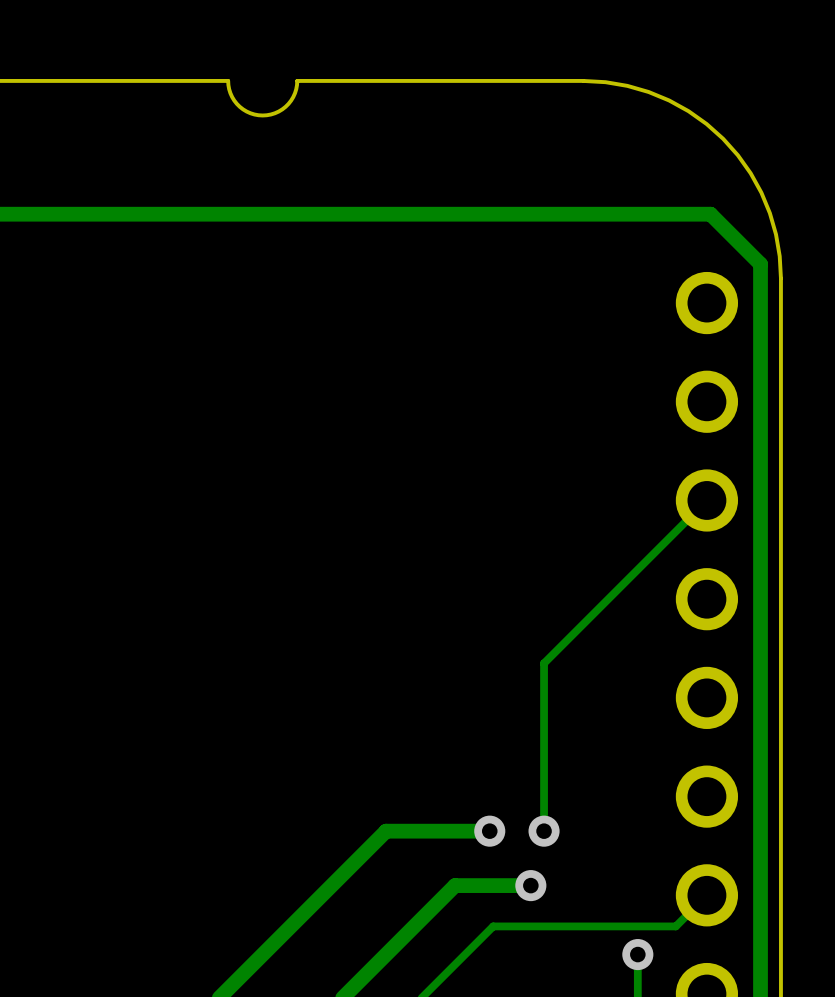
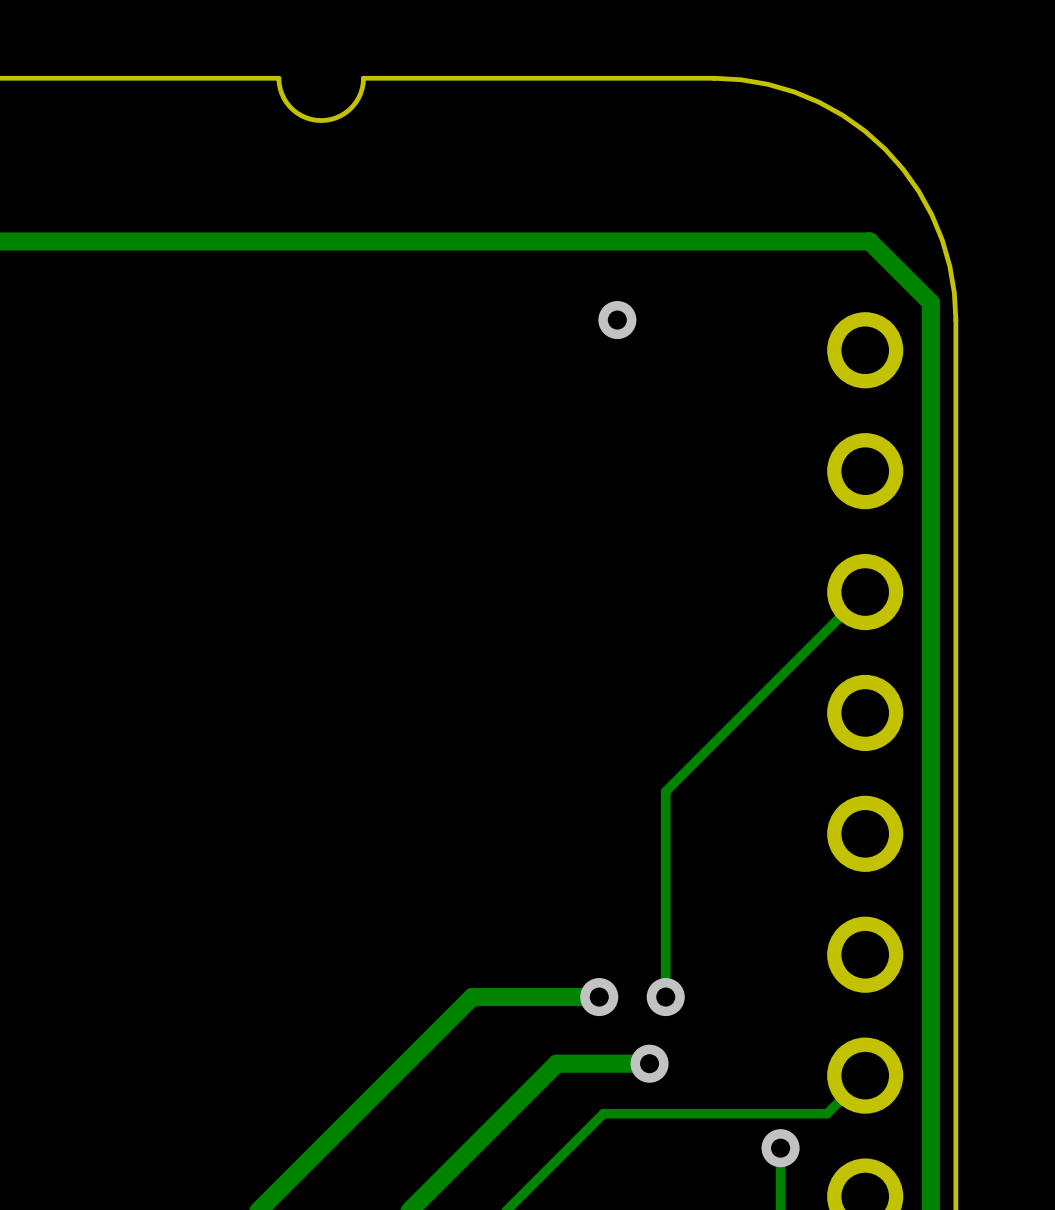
via: none -> (617, 320)

